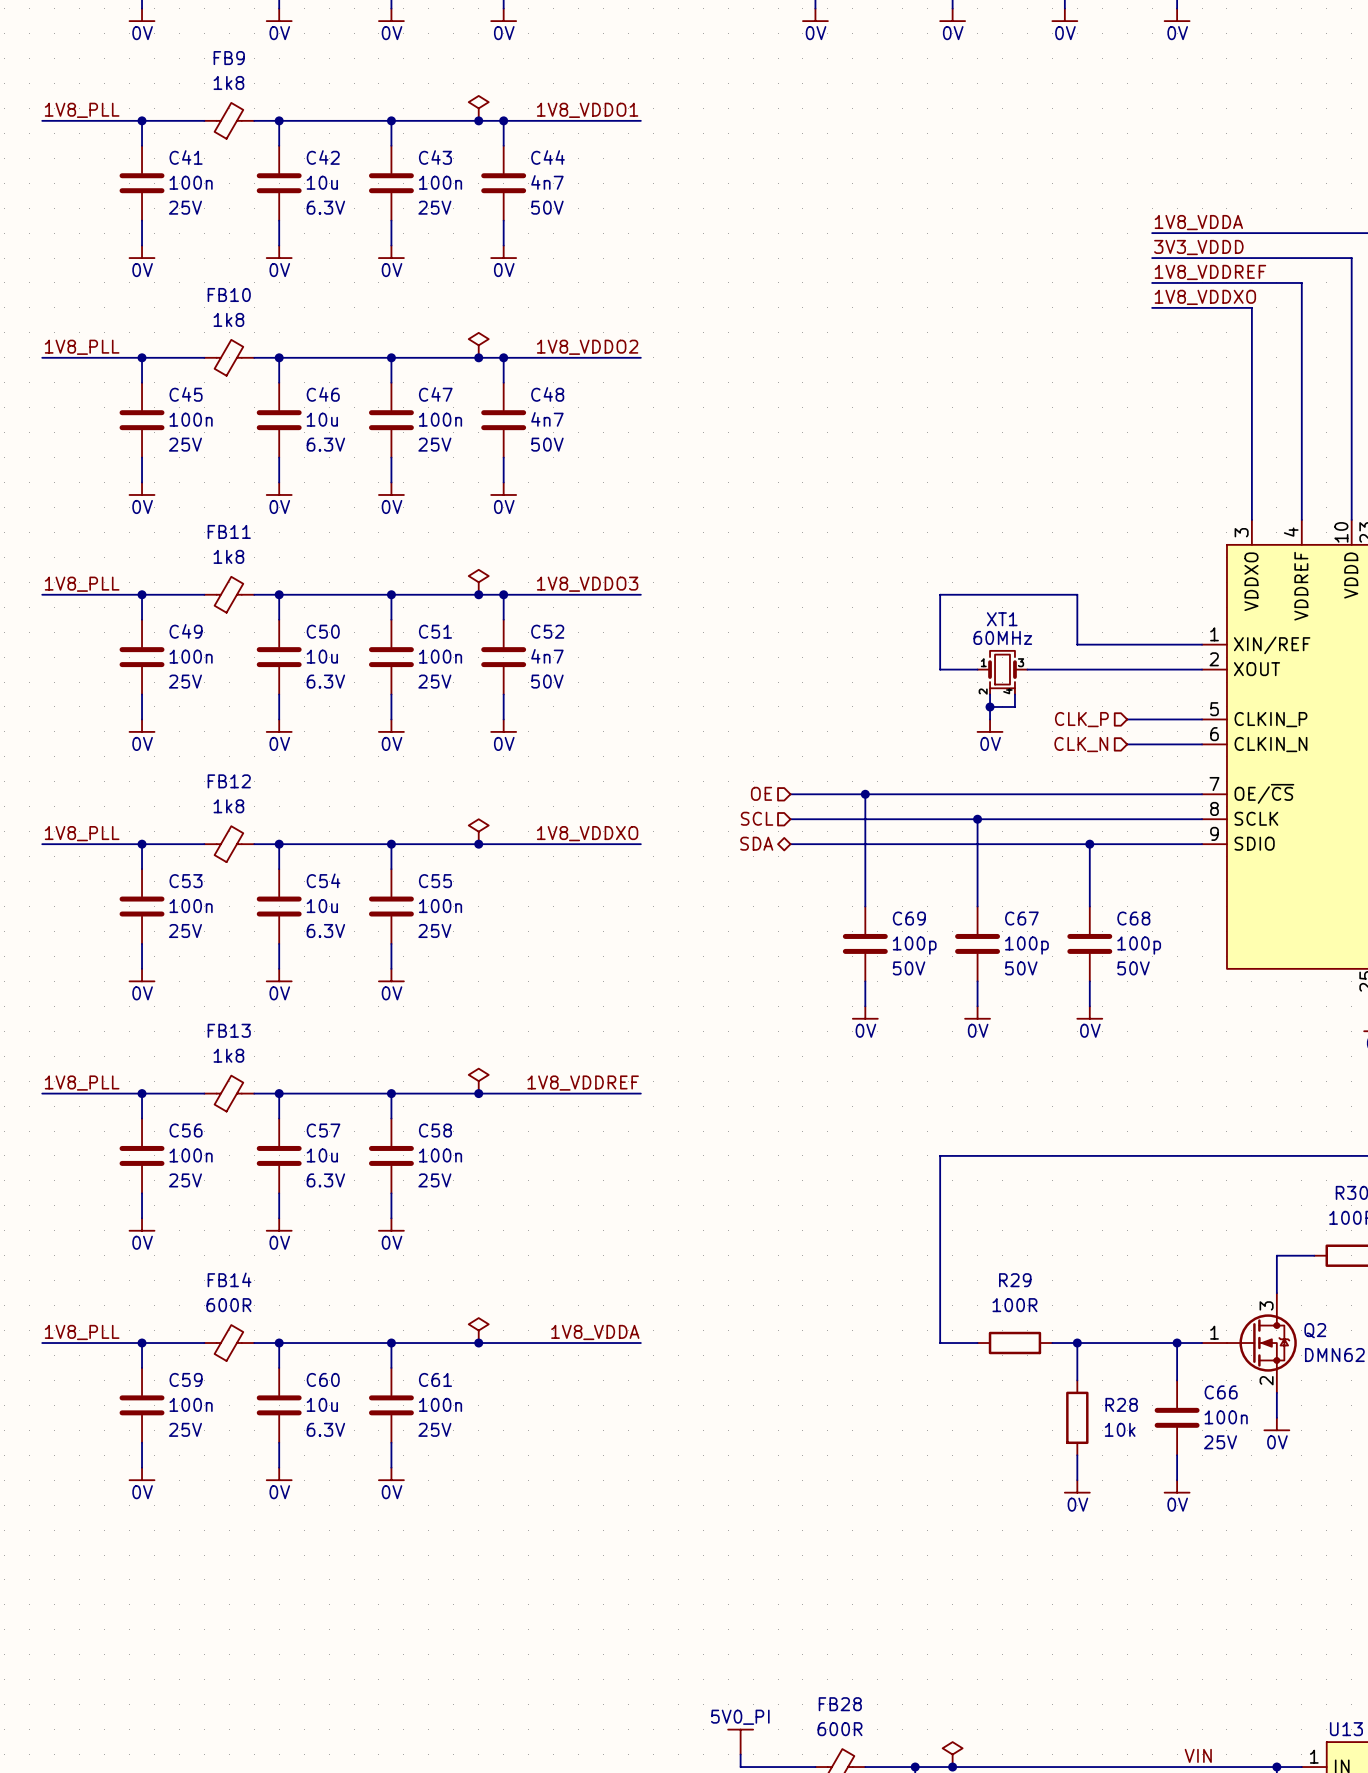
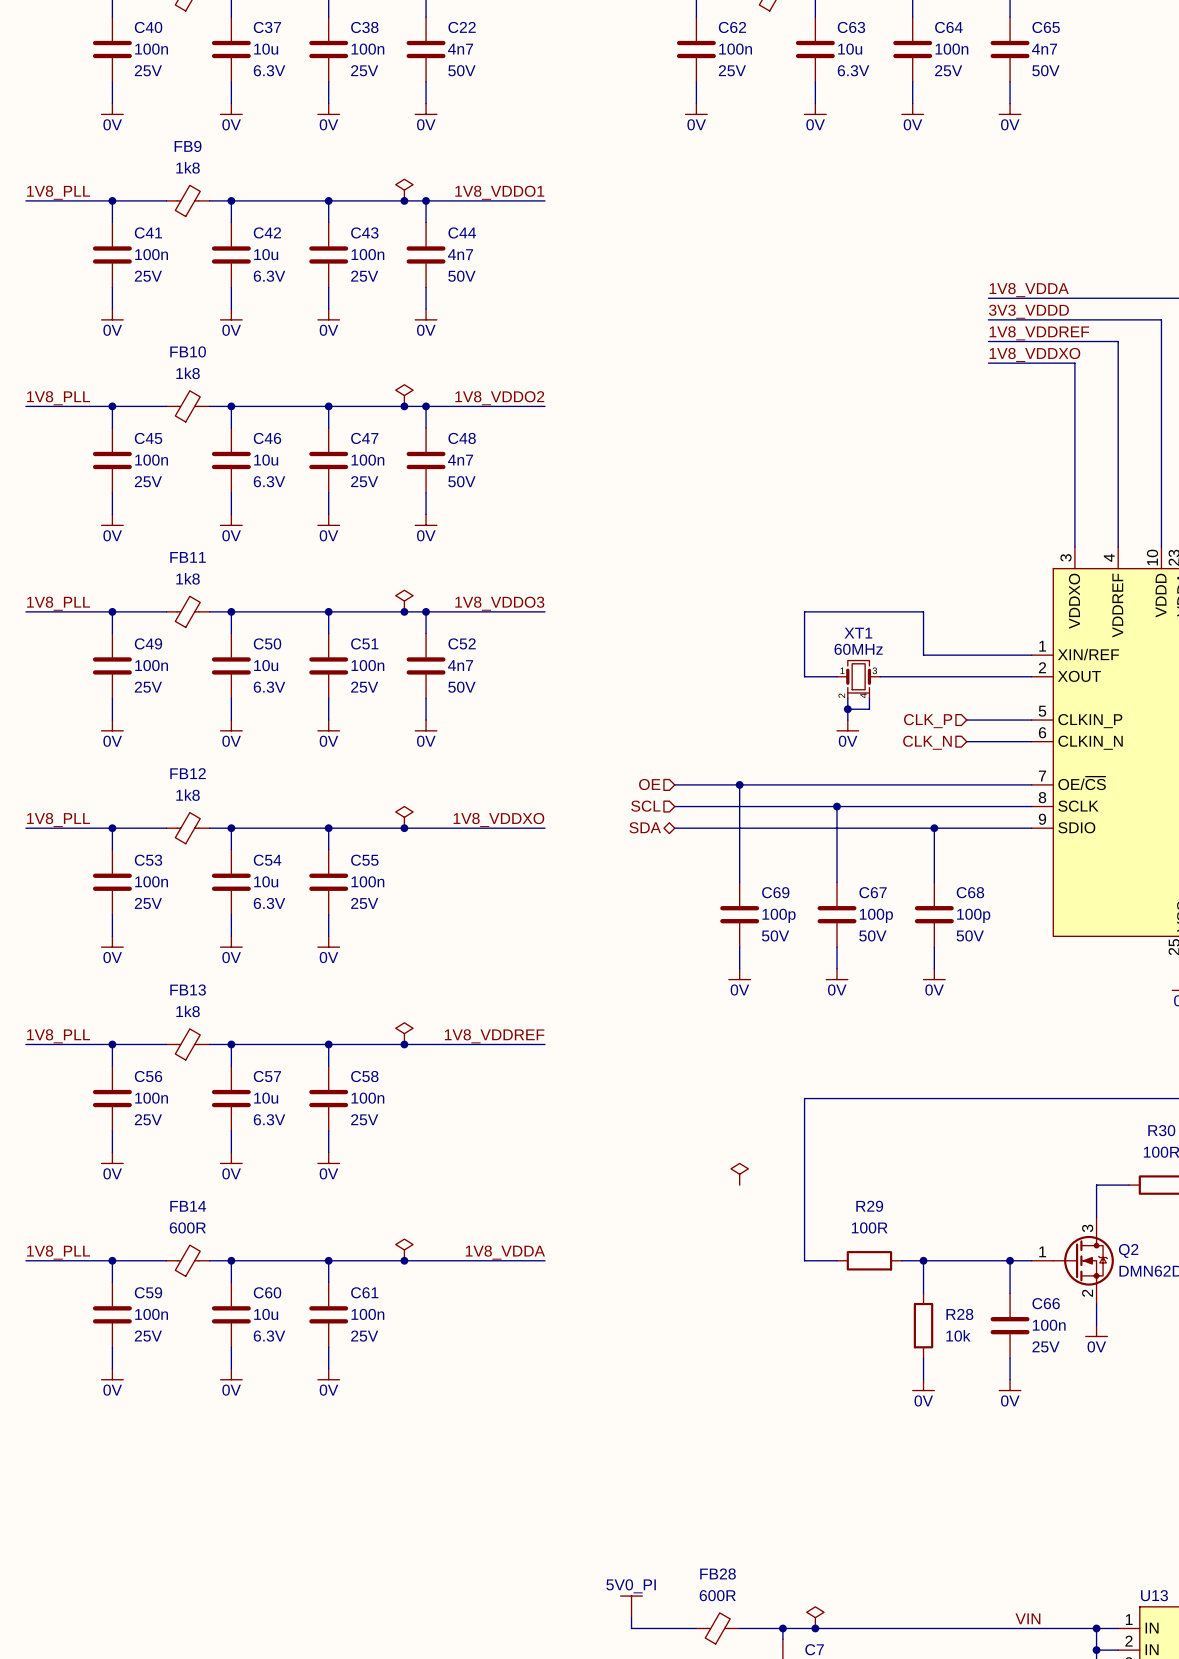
power symbol: none -> (739, 1174)

